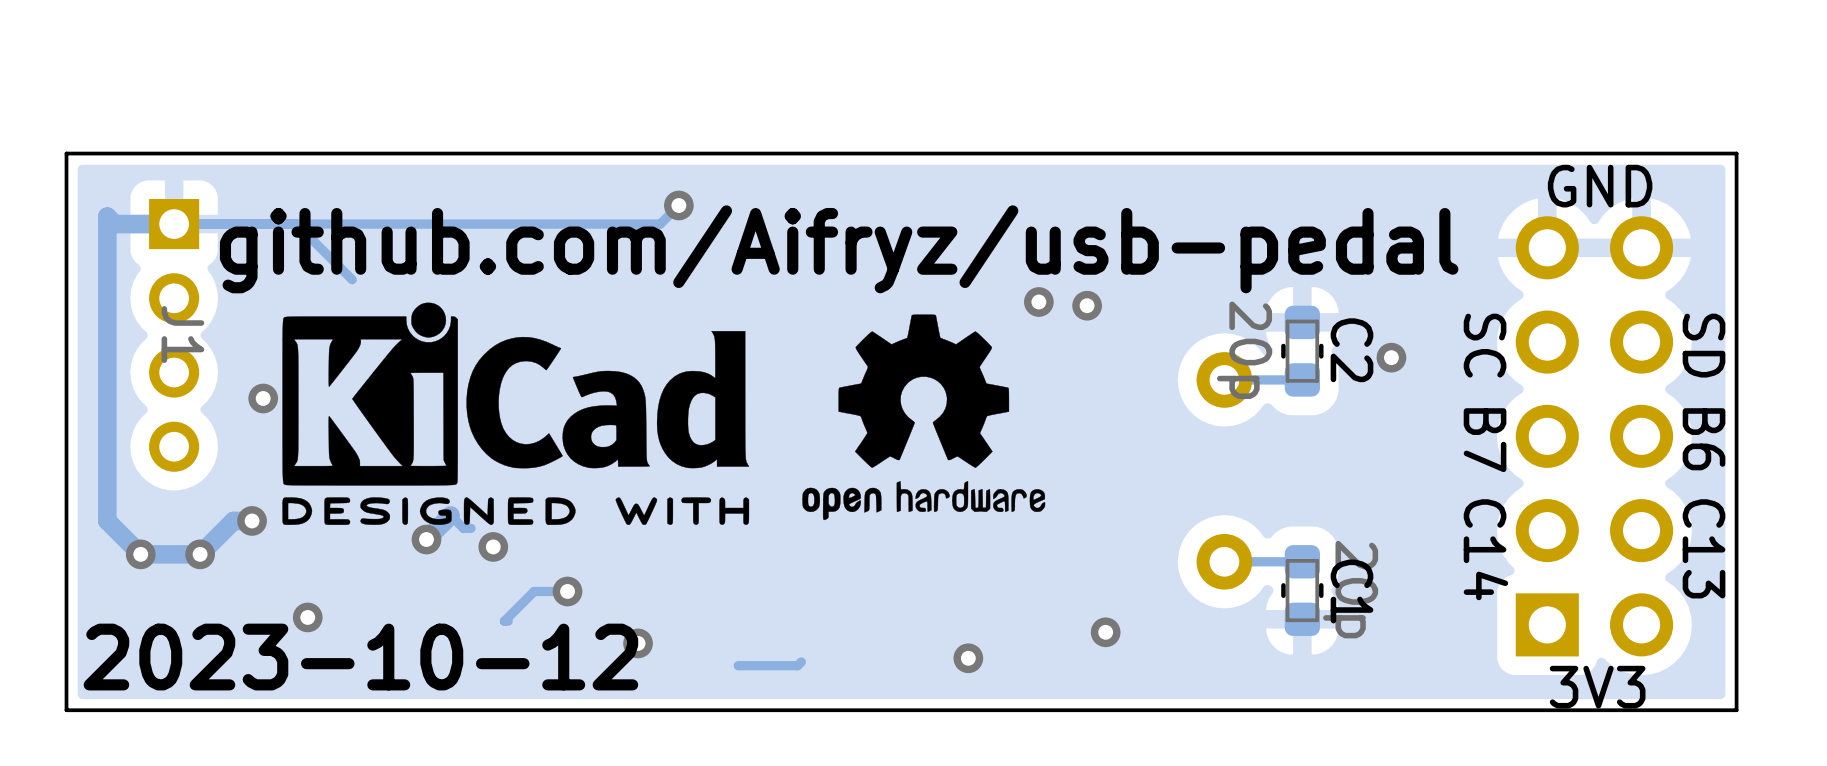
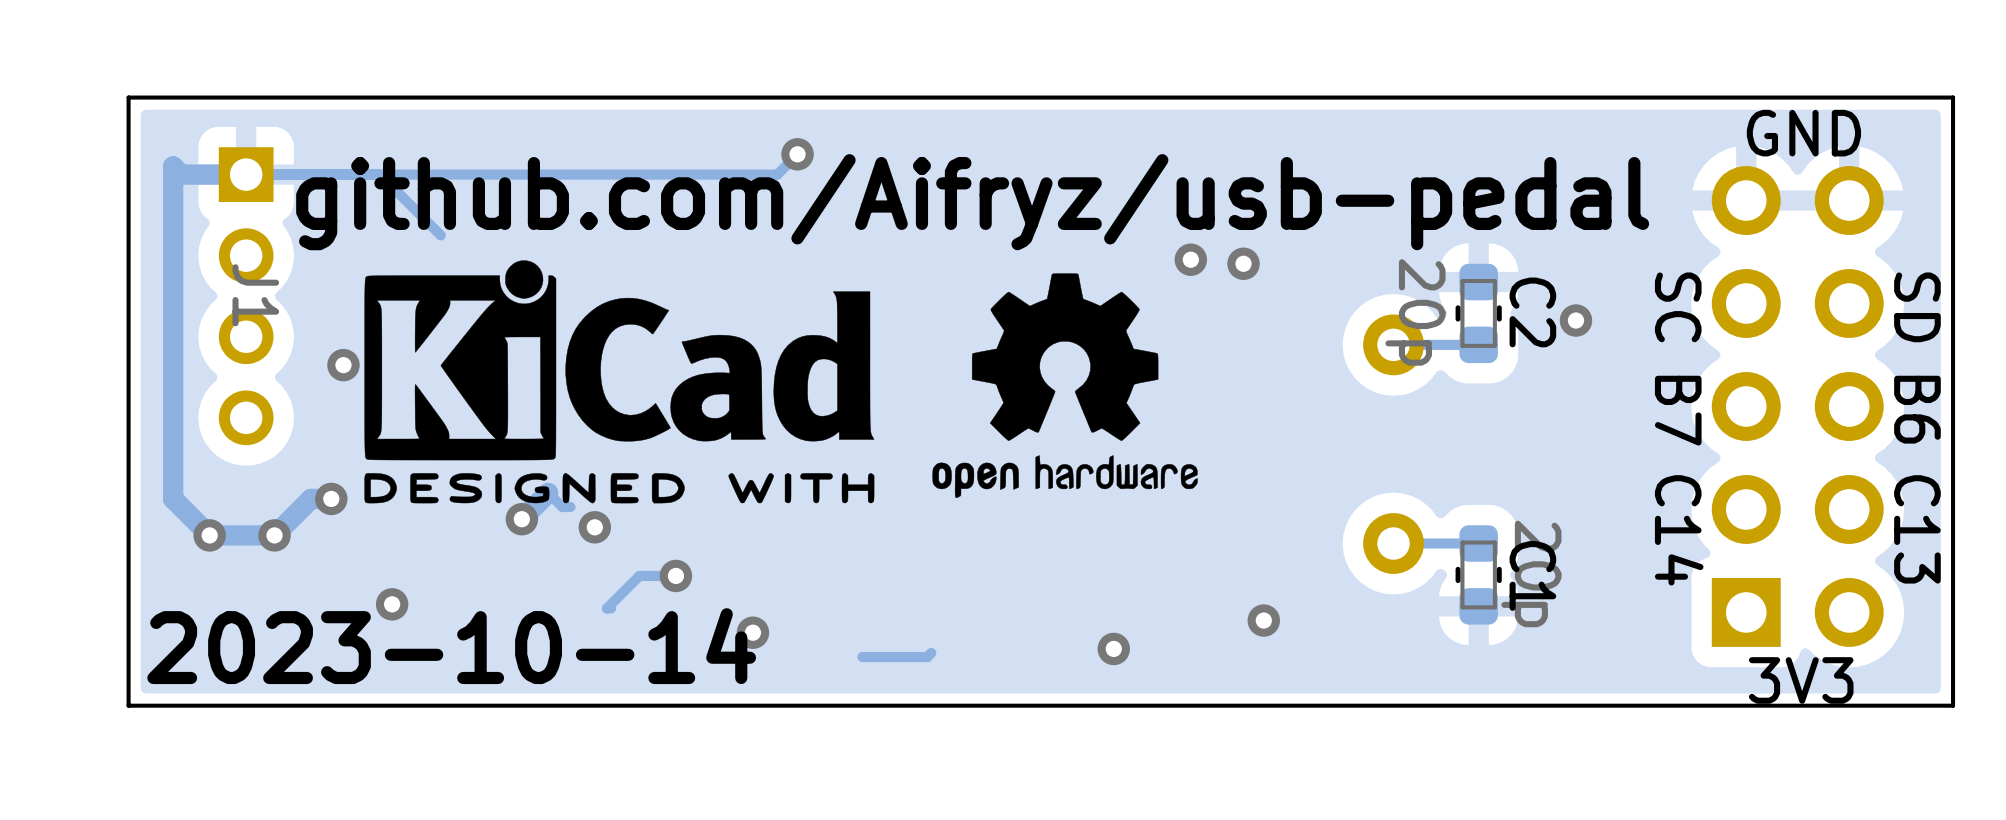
text: 2023-10-12 (360, 657) -> 2023-10-14 (451, 646)

